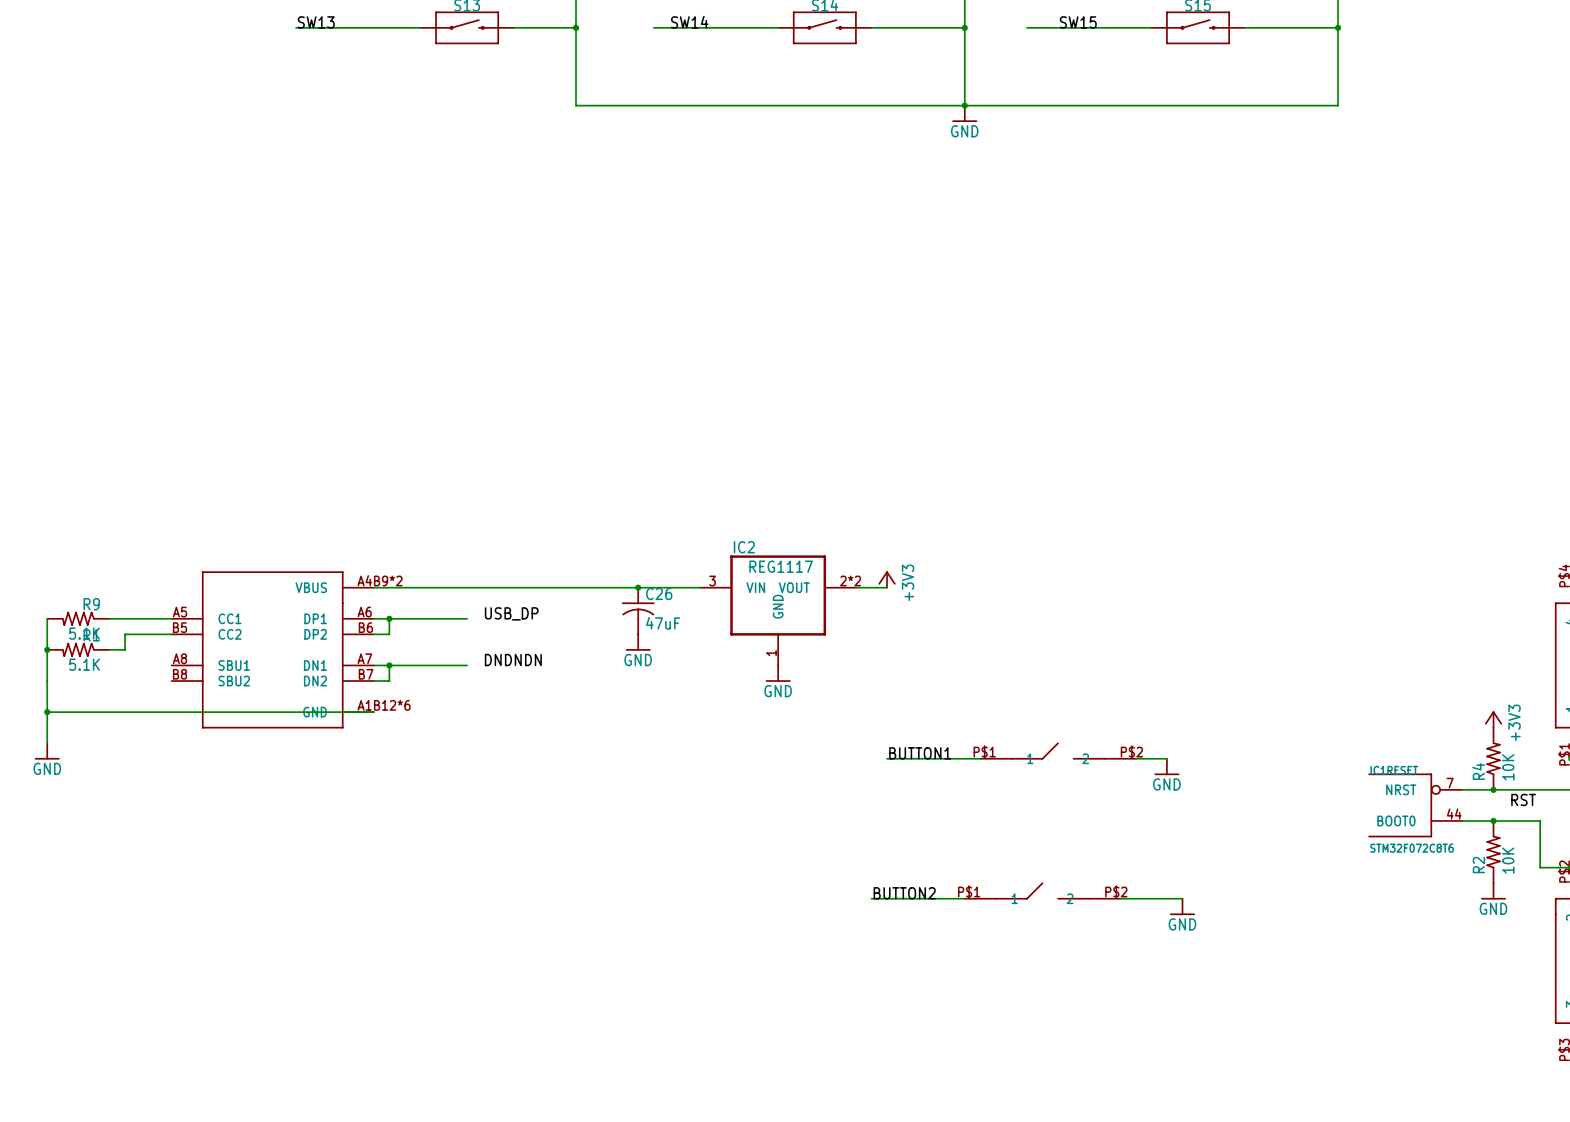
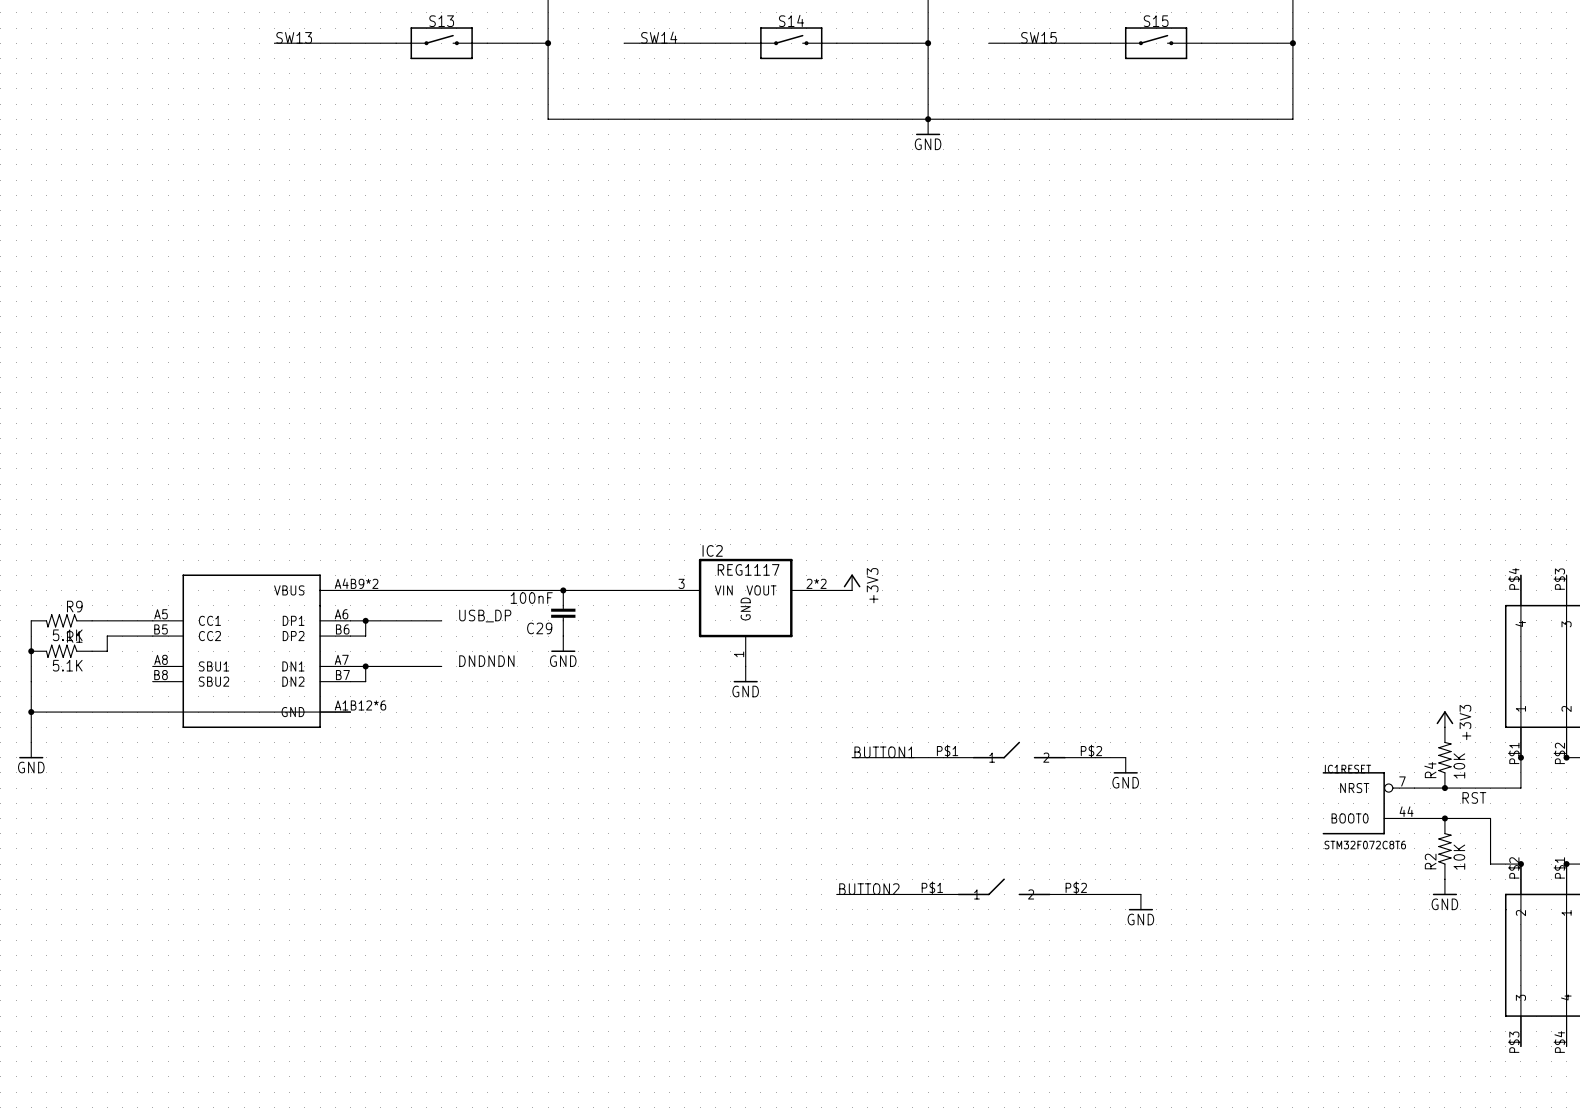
junction: none -> (563, 590)
junction: (638, 587) -> none
C29: none -> 100nF (563, 613)
C26: 47uF (638, 611) -> none
power symbol position: GND (638, 642) -> GND (563, 644)

